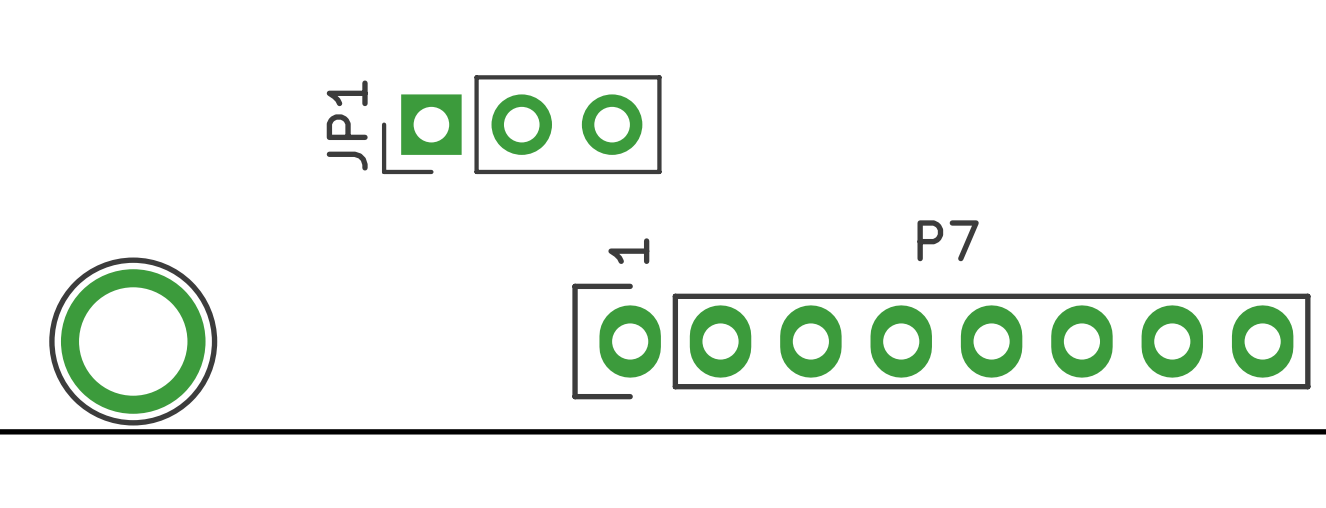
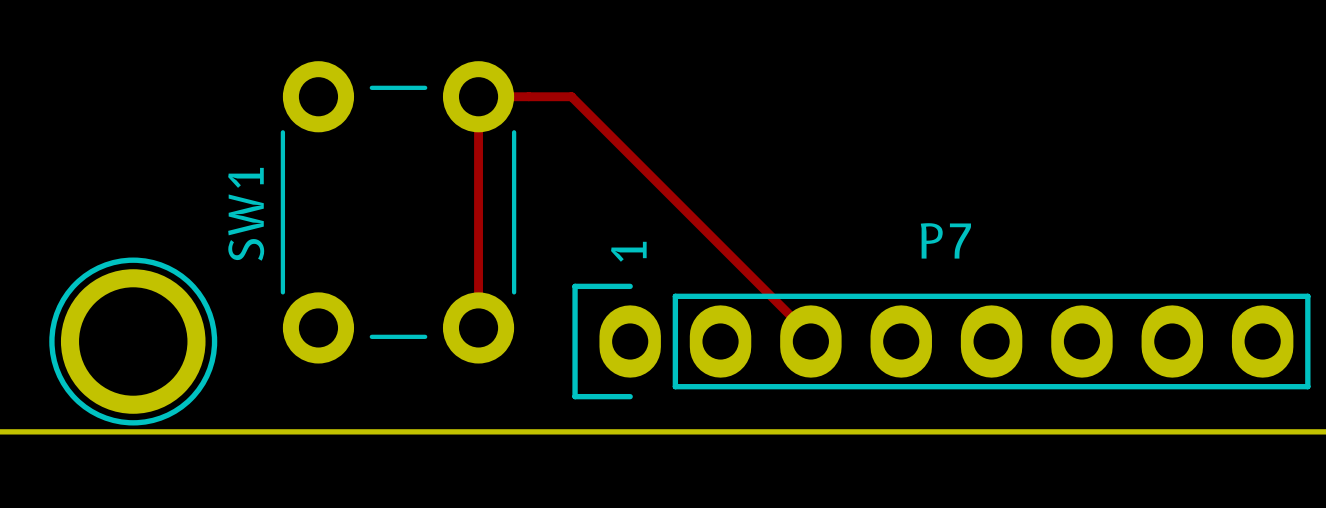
JP1: (521, 124) -> none
SW1: none -> (398, 212)
track: none -> (478, 327) (478, 96) (571, 96) (810, 336) (810, 341)

